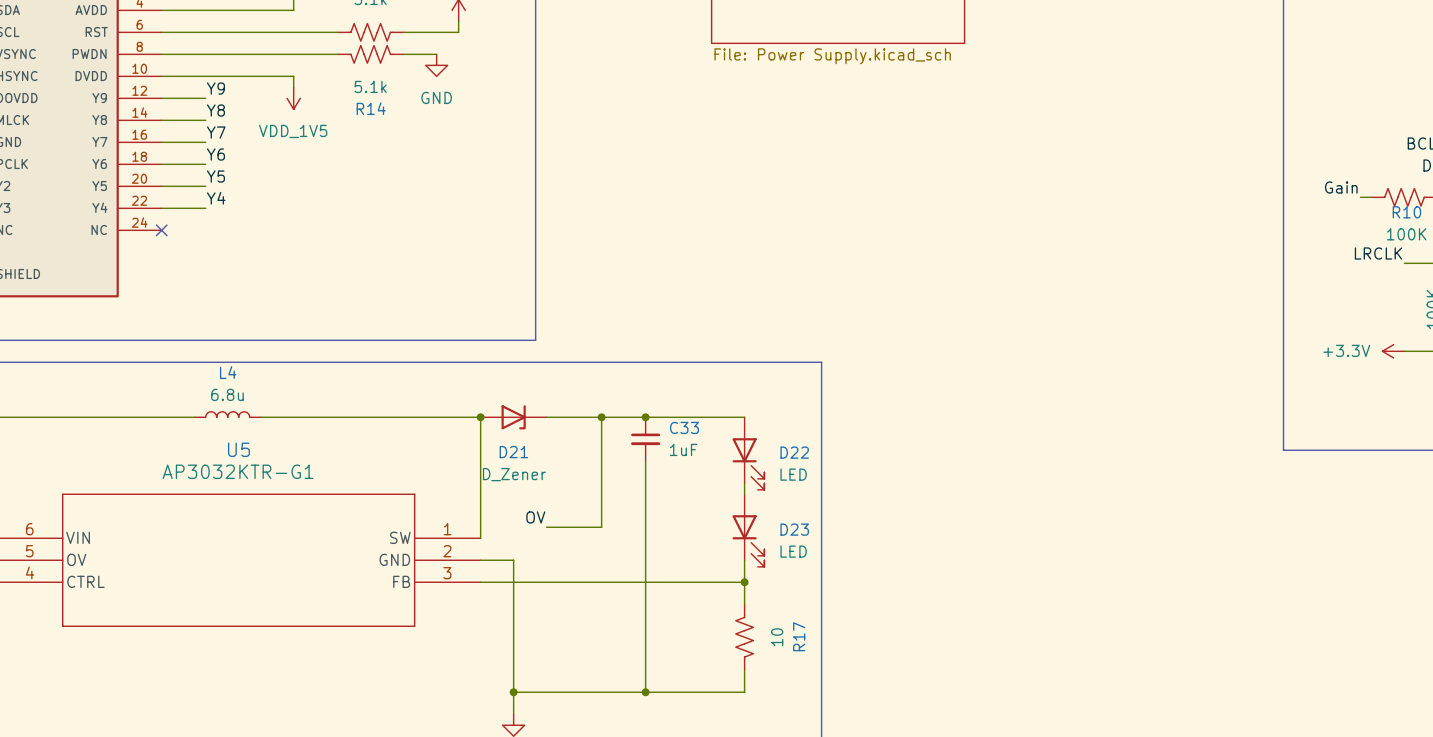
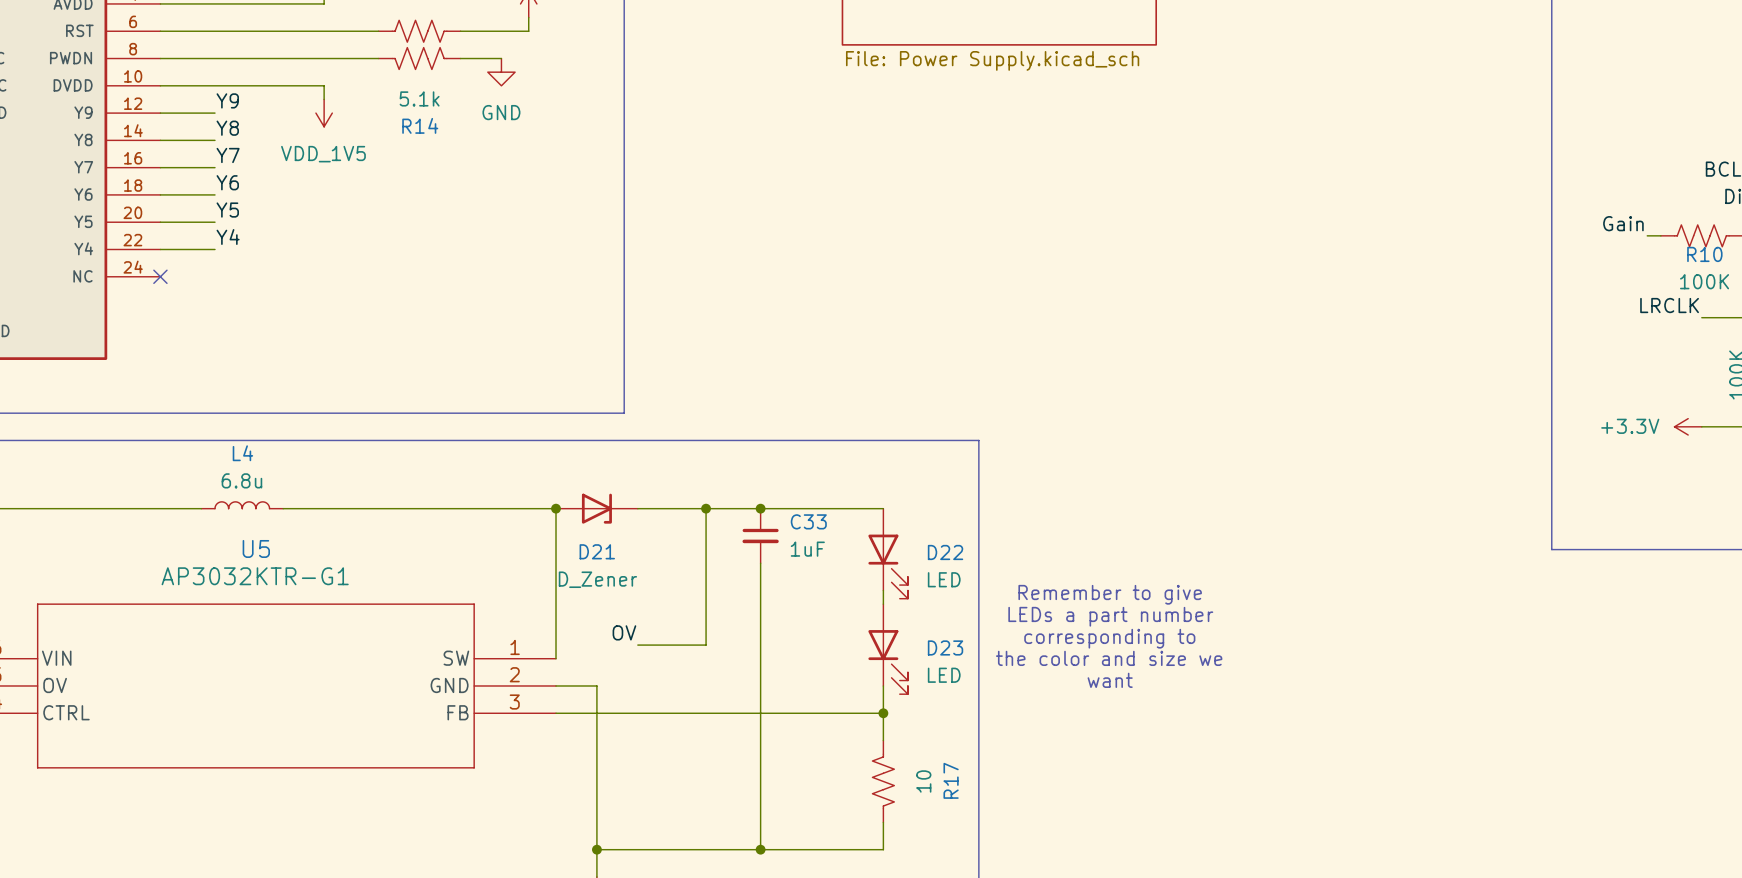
text: none -> Remember to give (1110, 594)
text: none -> LEDs a part number (1110, 616)
text: none -> corresponding to (1109, 638)
text: none -> the color and size we (1109, 658)
text: none -> want (1110, 680)

